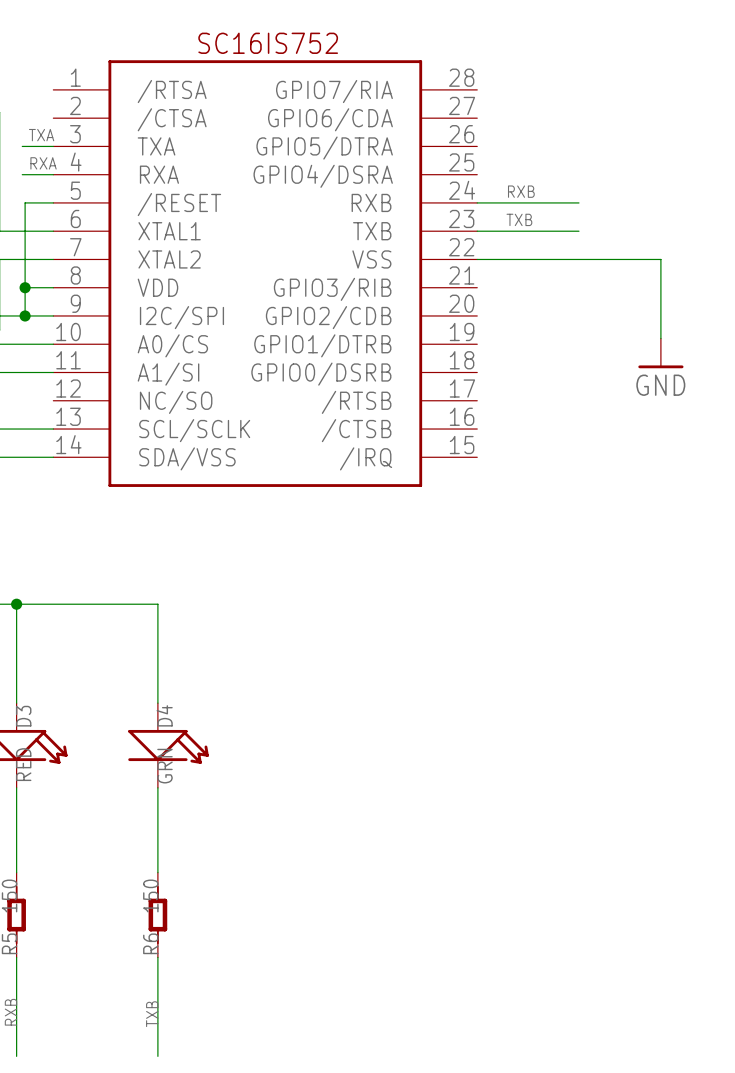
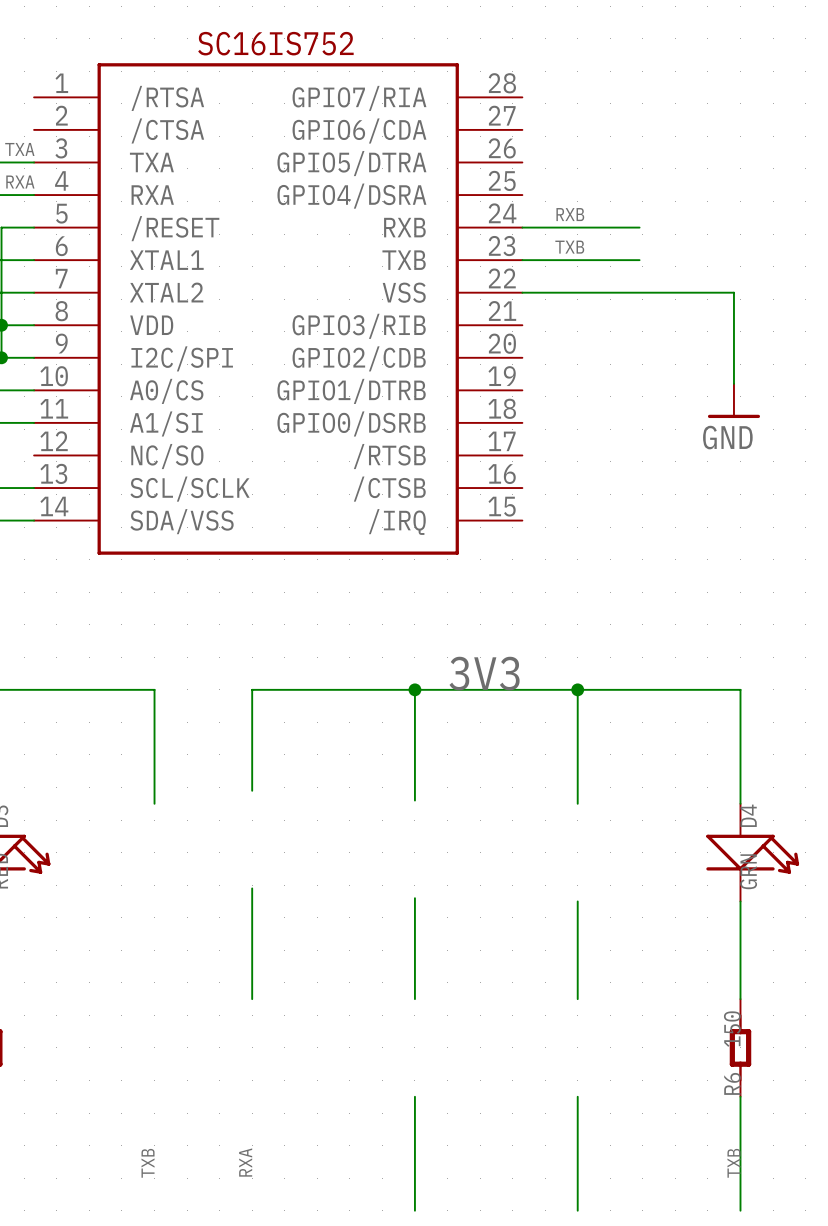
label: none -> 3V3 (484, 673)
wire: none -> (414, 689) (414, 800)
junction: none -> (414, 689)
wire: none -> (577, 689) (577, 803)
junction: none -> (577, 689)
wire: none -> (252, 790) (252, 689) (740, 689) (740, 803)
D4 position: (168, 745) -> (752, 852)
wire: none -> (252, 888) (252, 999)
wire: none -> (414, 898) (414, 999)
wire: (157, 787) (157, 872) -> none
wire: none -> (577, 901) (577, 999)
wire: none -> (740, 901) (740, 999)
R6 position: (157, 915) -> (740, 1047)
wire: (157, 957) (157, 1056) -> (414, 1096) (414, 1210)
wire: none -> (577, 1096) (577, 1210)
wire: none -> (740, 1096) (740, 1210)
label: none -> RXA (245, 1162)
label: none -> TXB (733, 1163)

